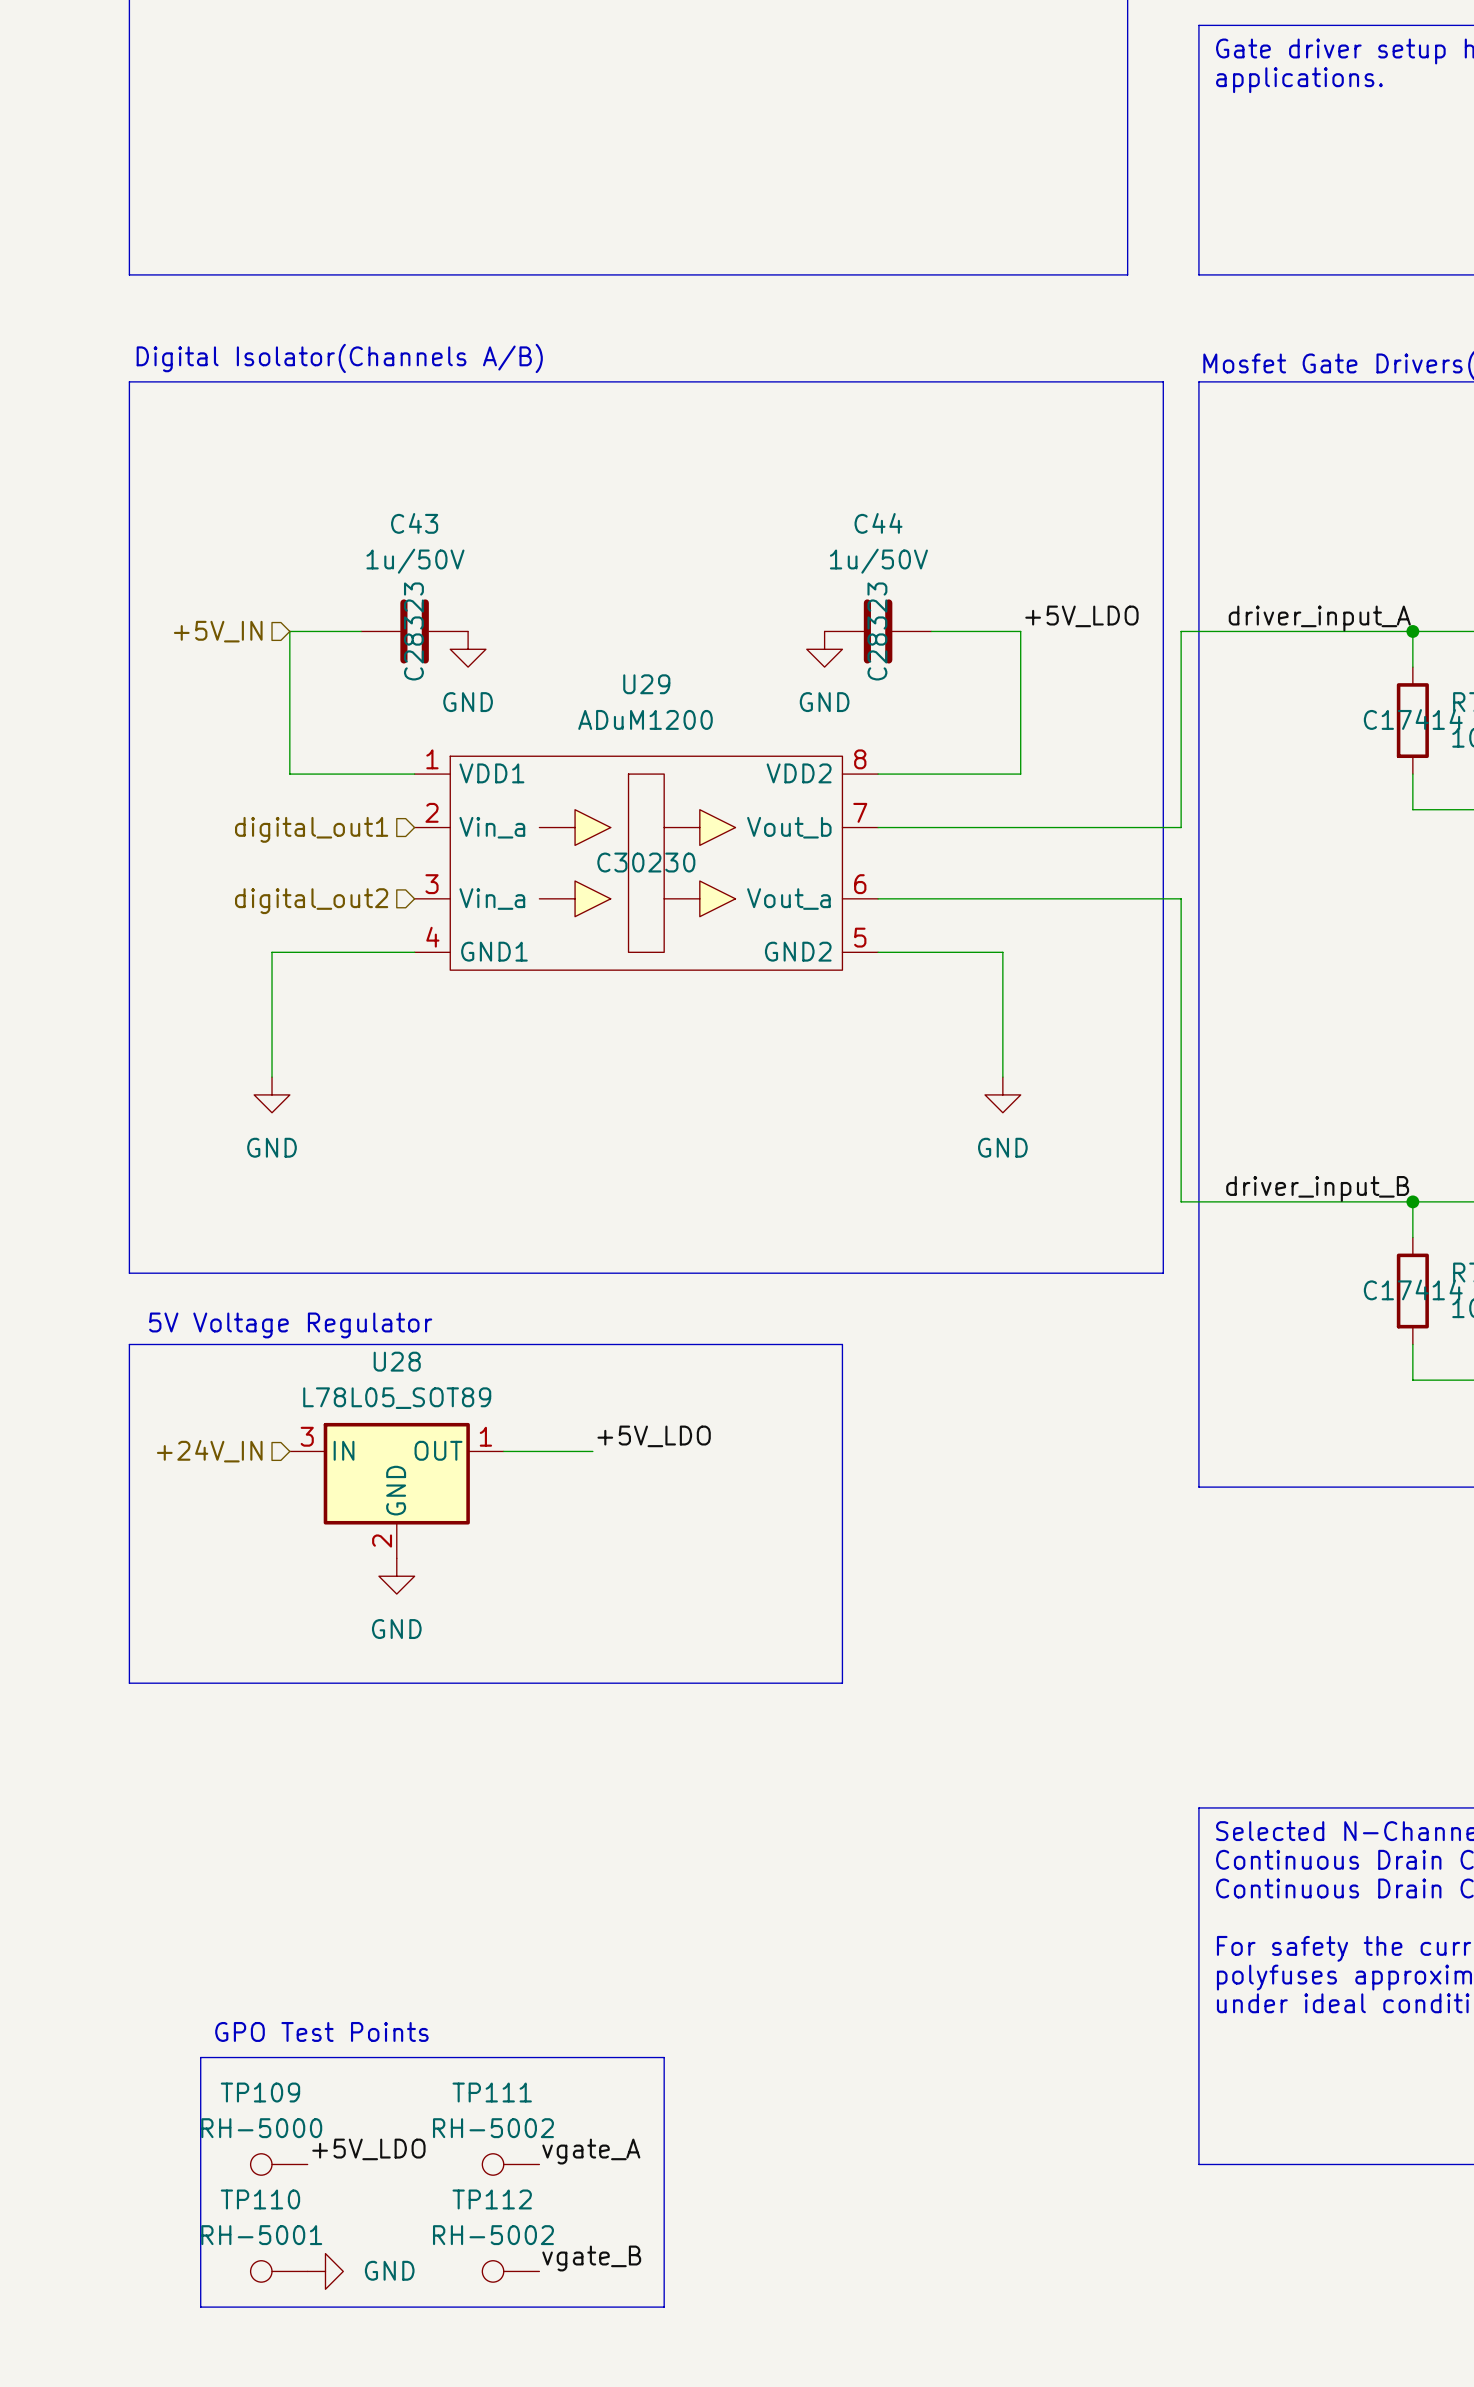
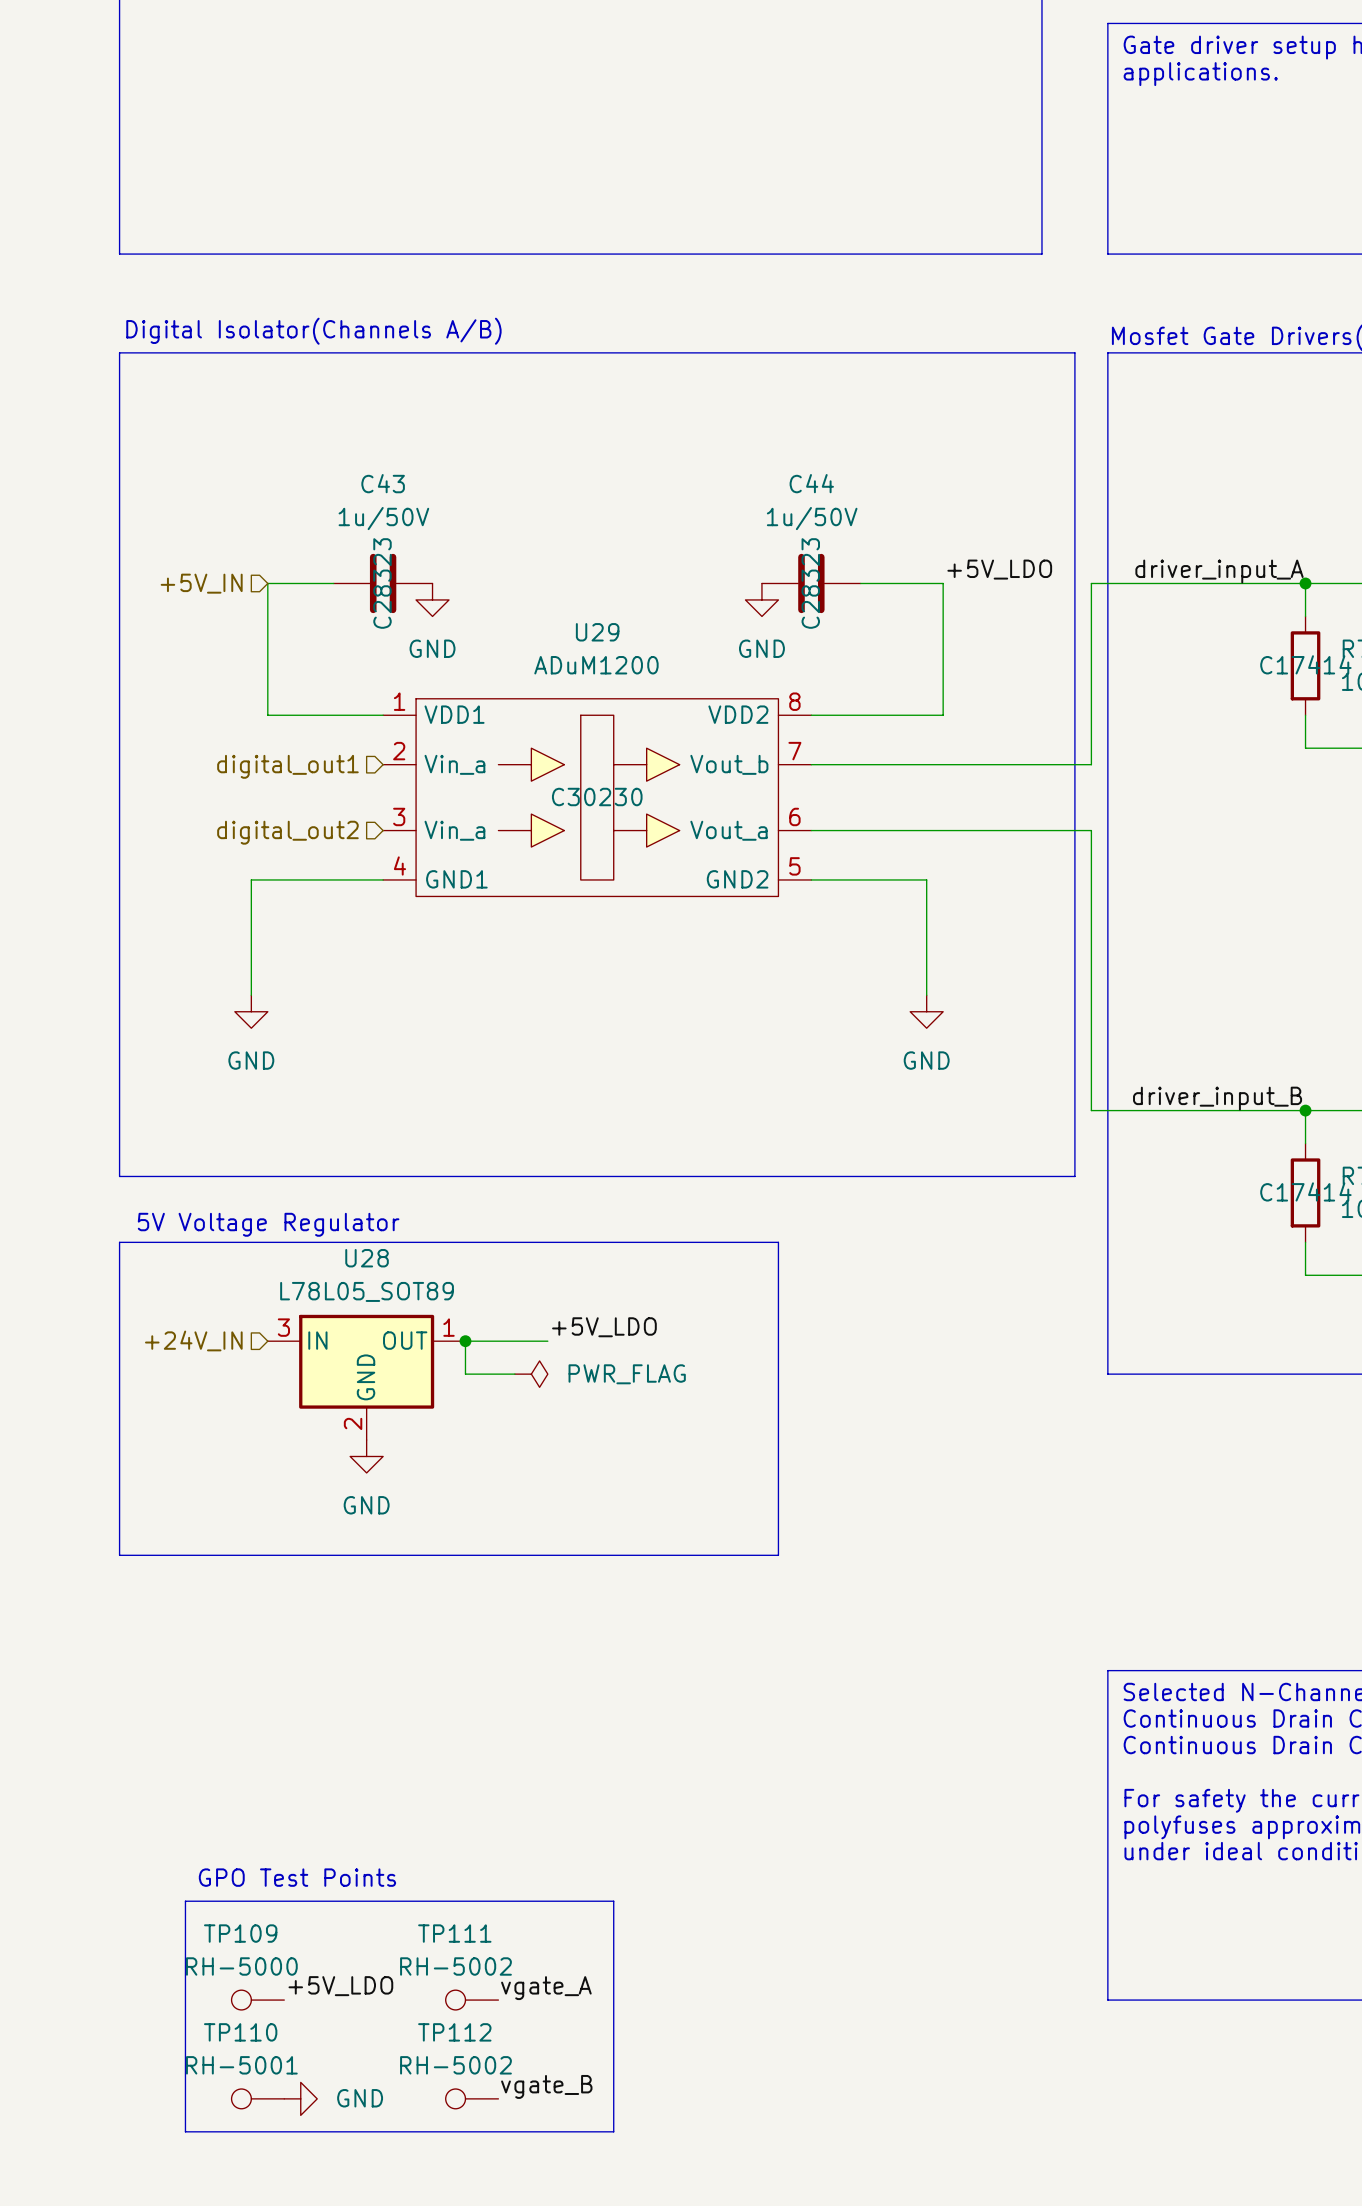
wire: none -> (465, 1341) (465, 1374) (514, 1374)
junction: none -> (465, 1341)
power symbol: none -> PWR_FLAG (531, 1374)

